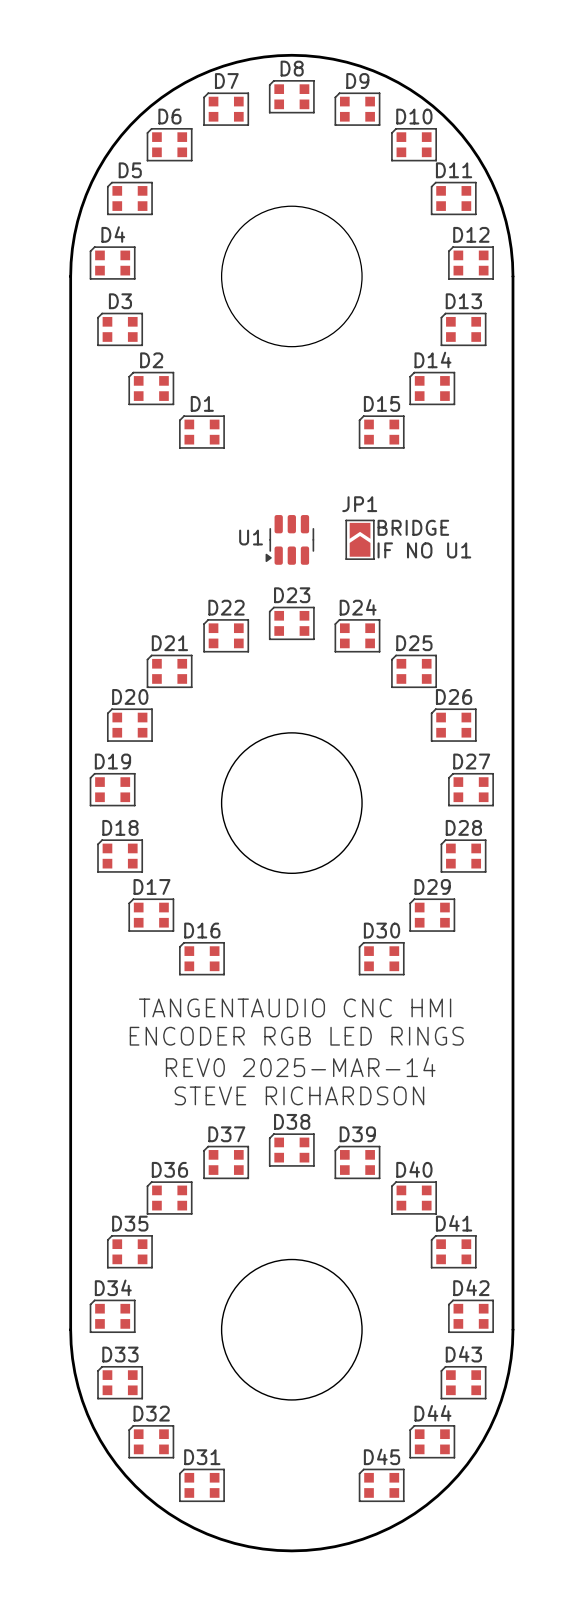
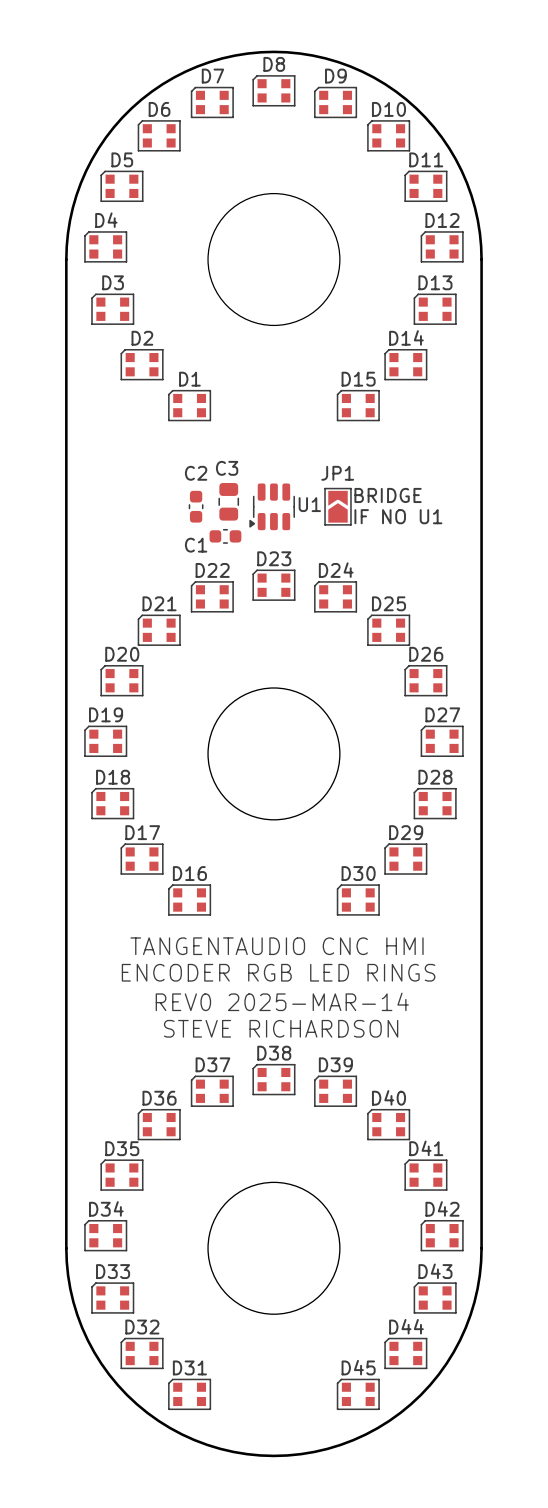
C3: none -> (228, 501)
U1 name position: U1 (251, 537) -> U1 (309, 504)
C2: none -> (196, 506)
C1: none -> (225, 536)

